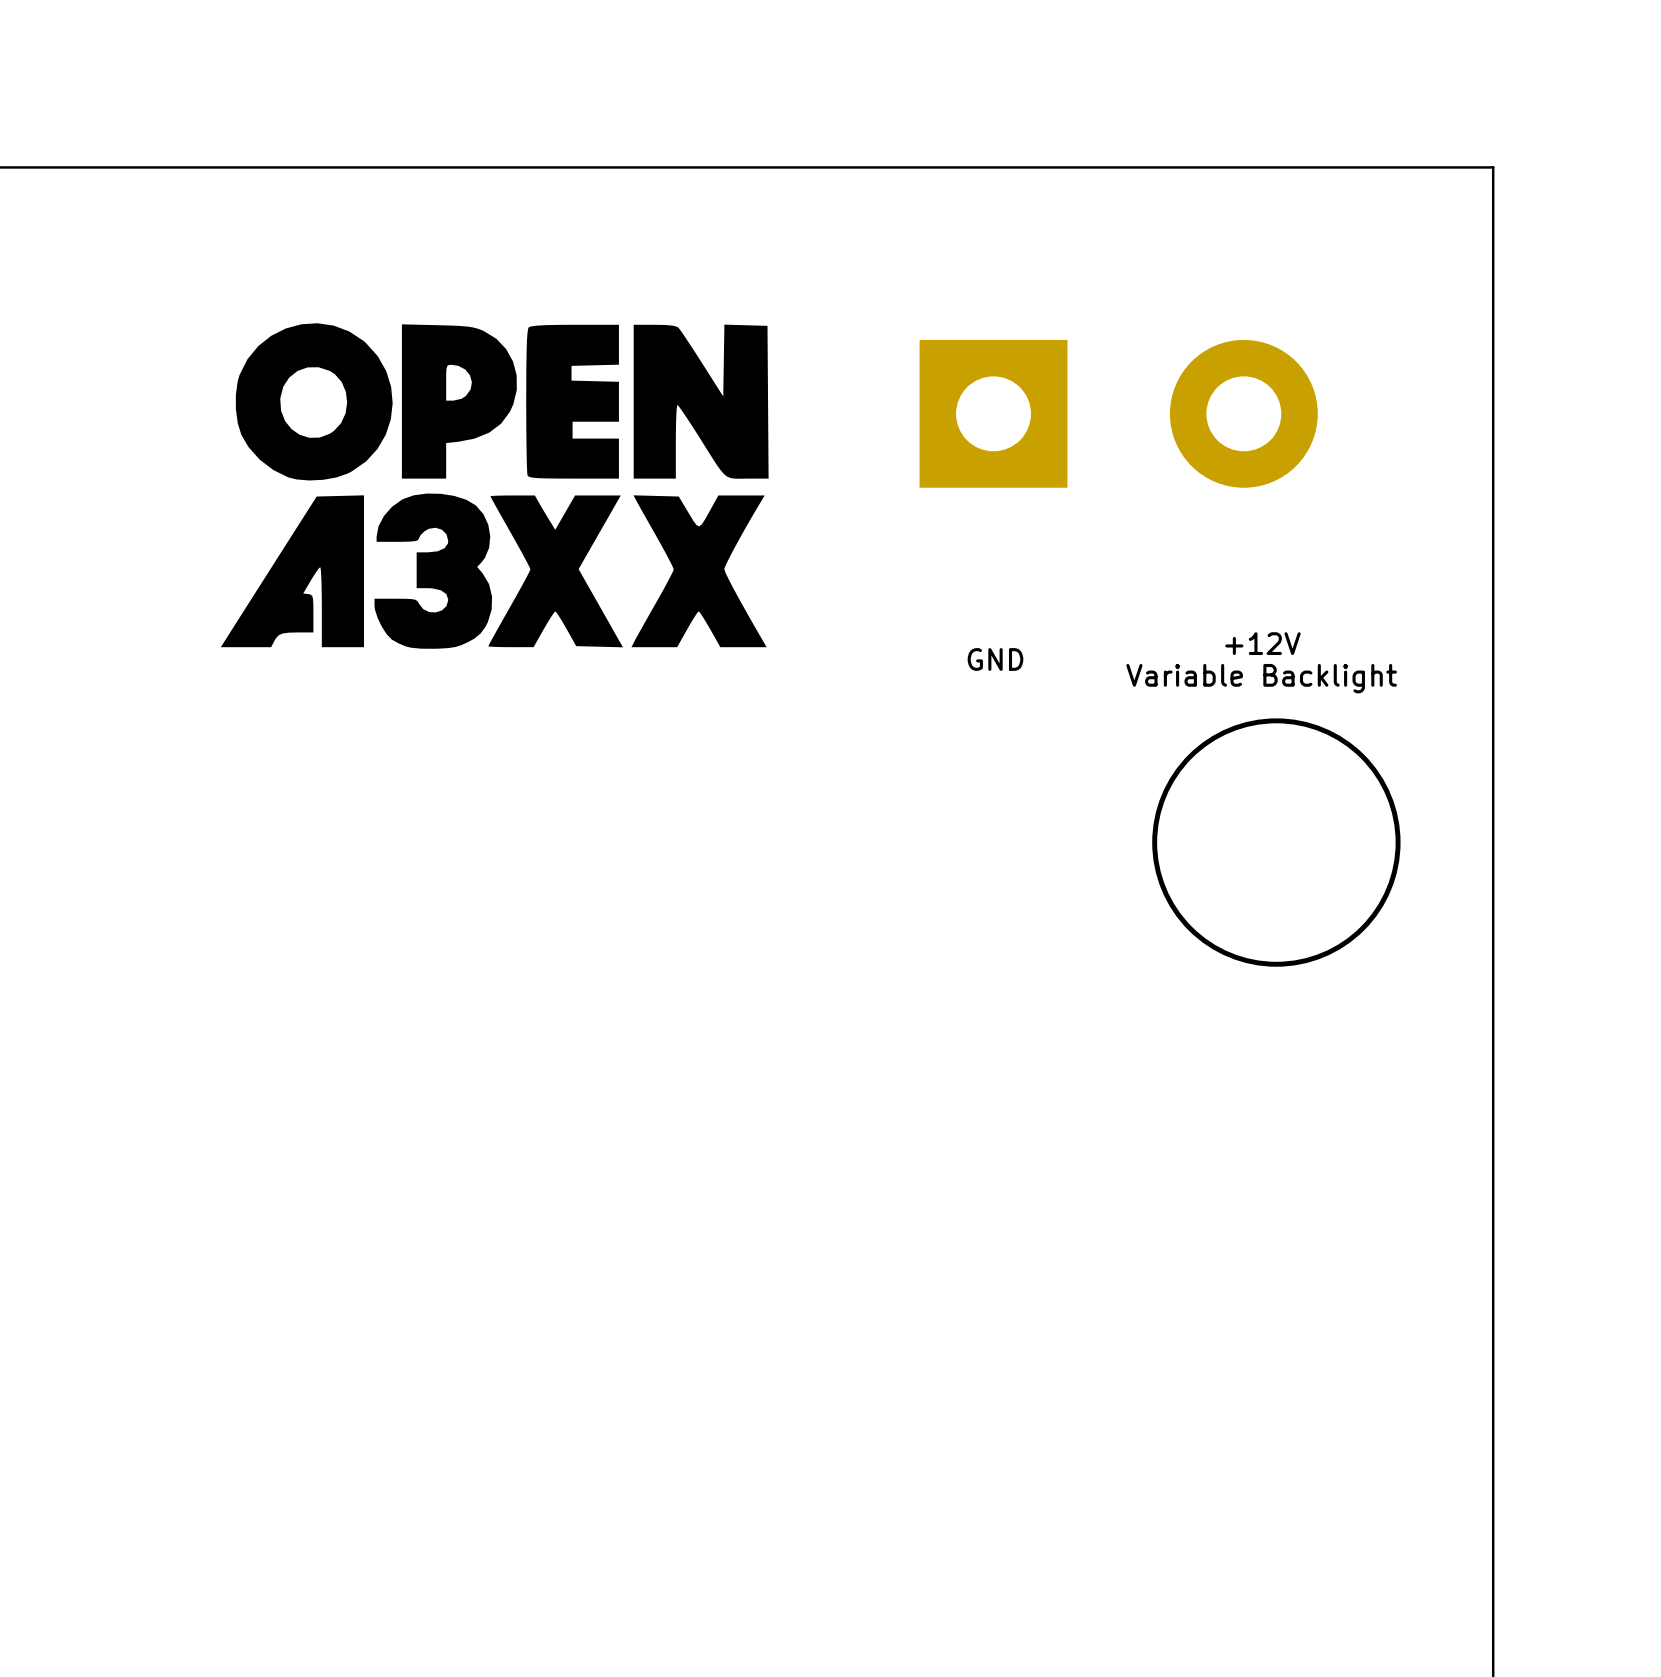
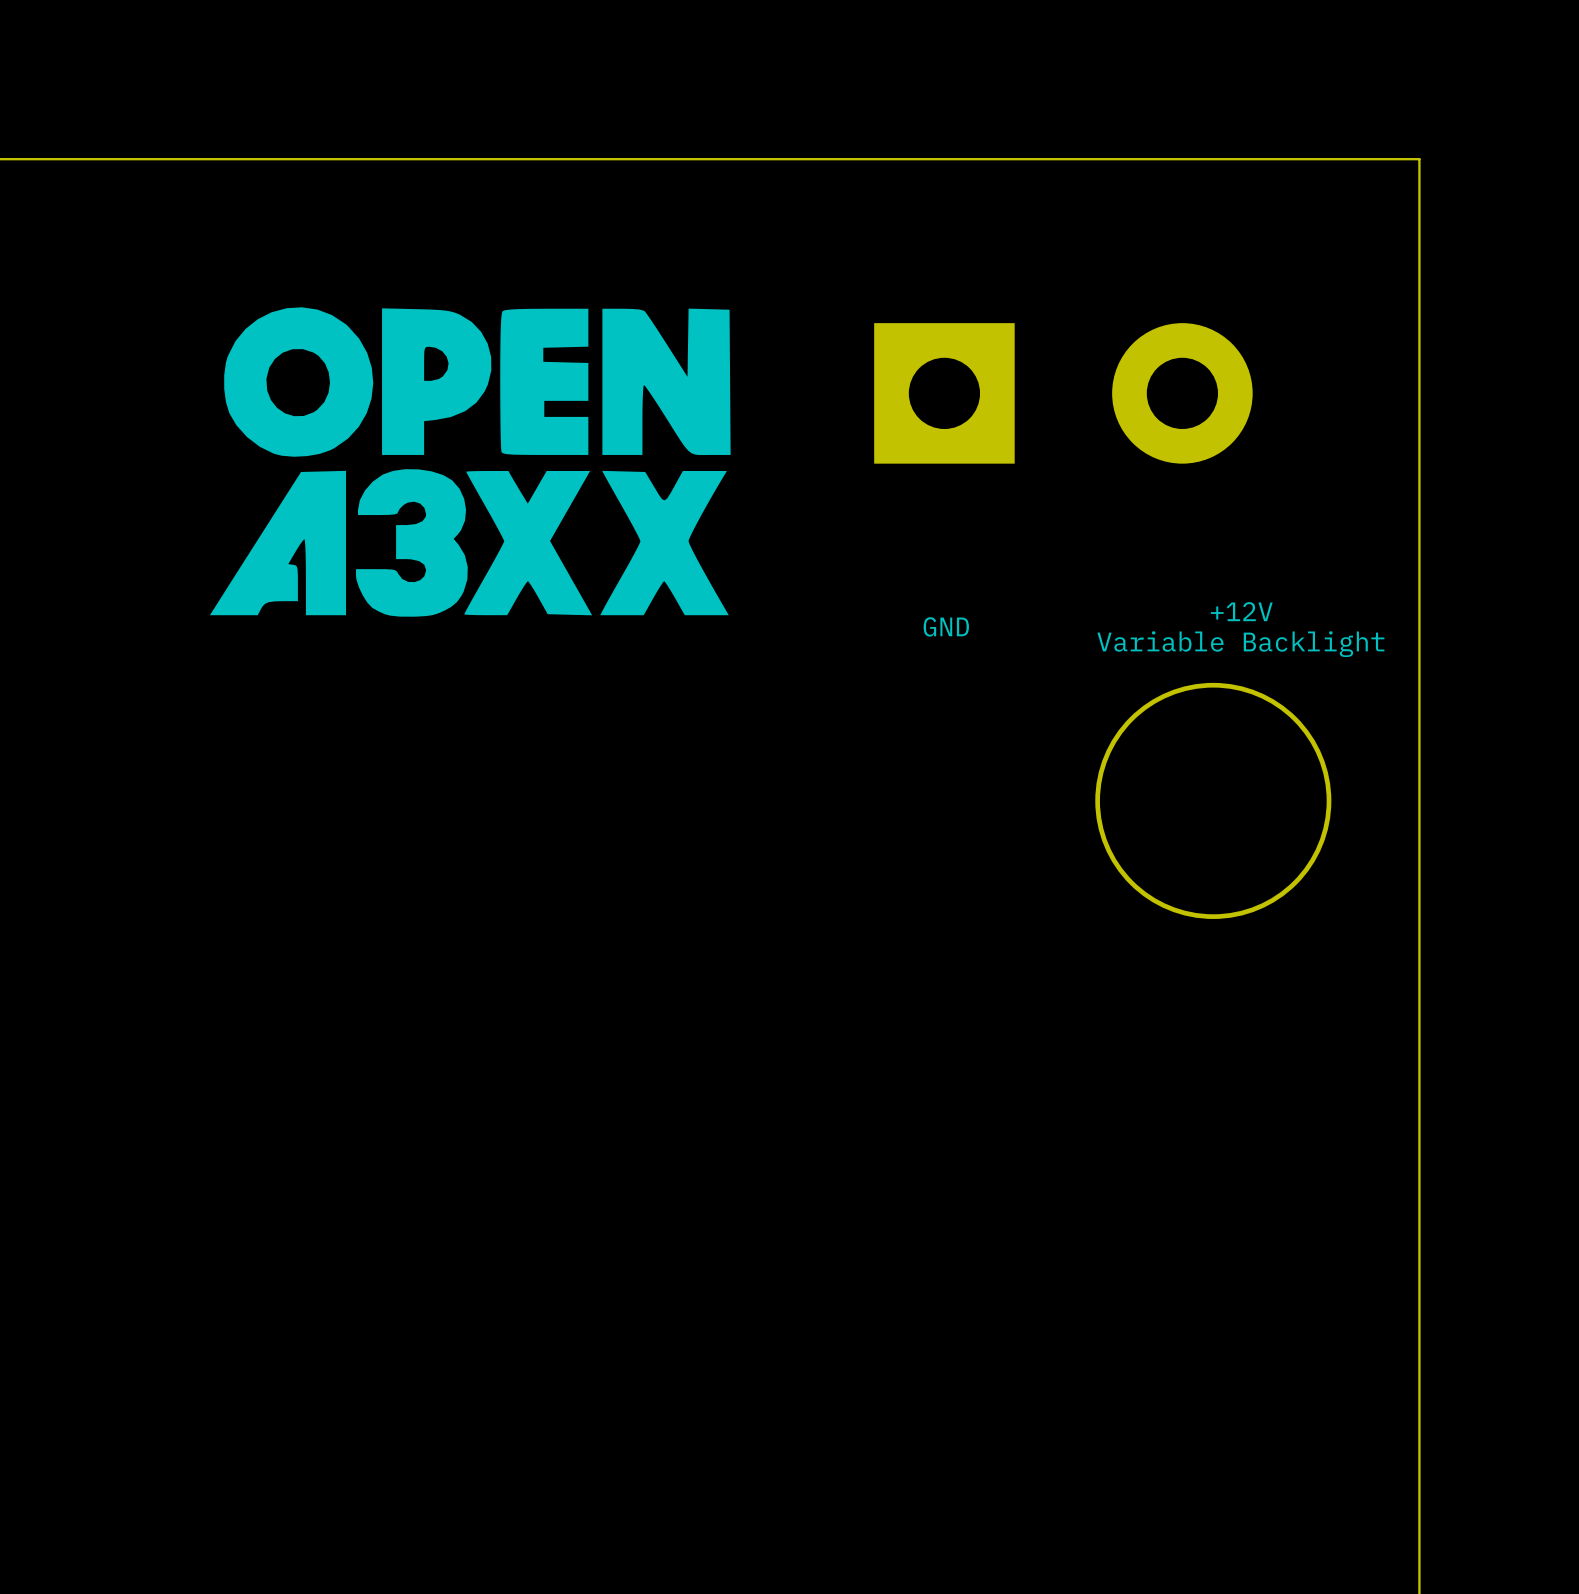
text position: +12V (1263, 643) -> +12V (1241, 611)
text position: Variable Backlight (1261, 678) -> Variable Backlight (1240, 644)

